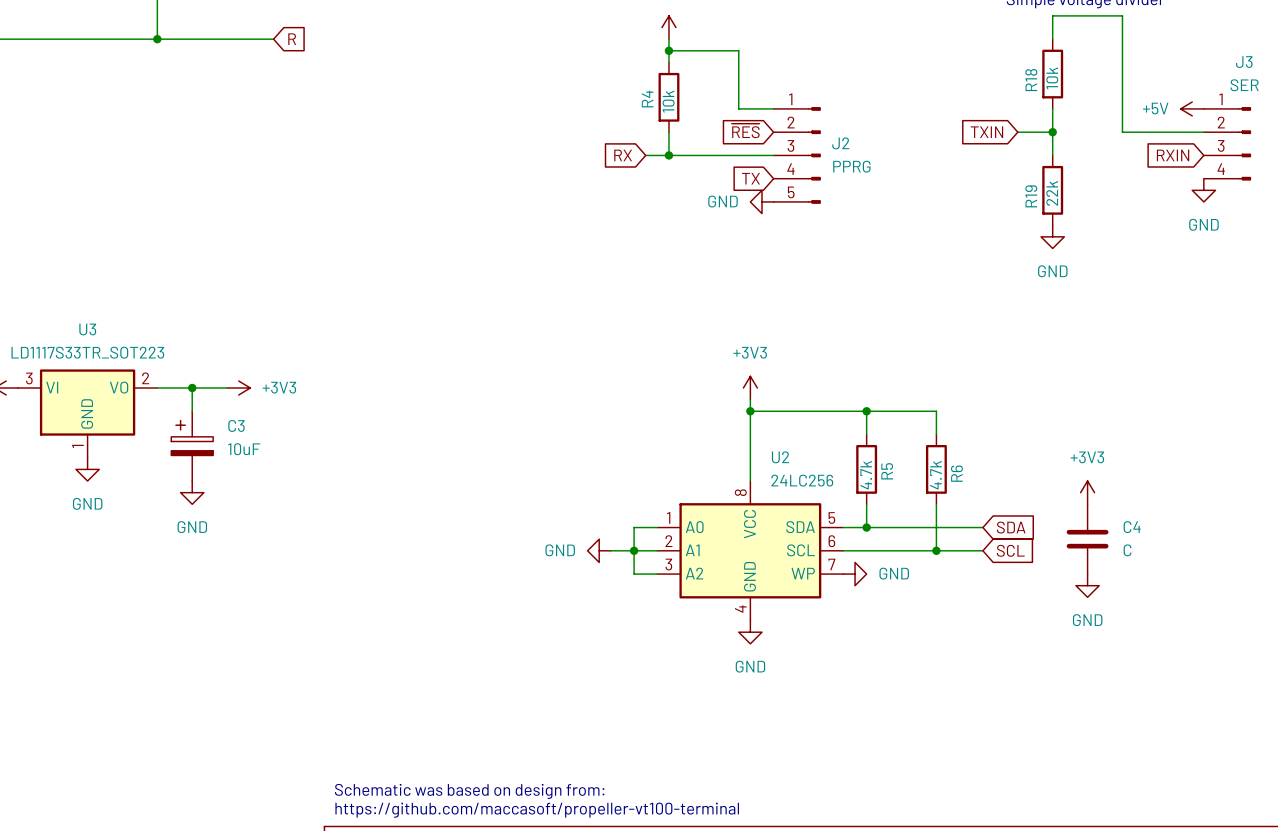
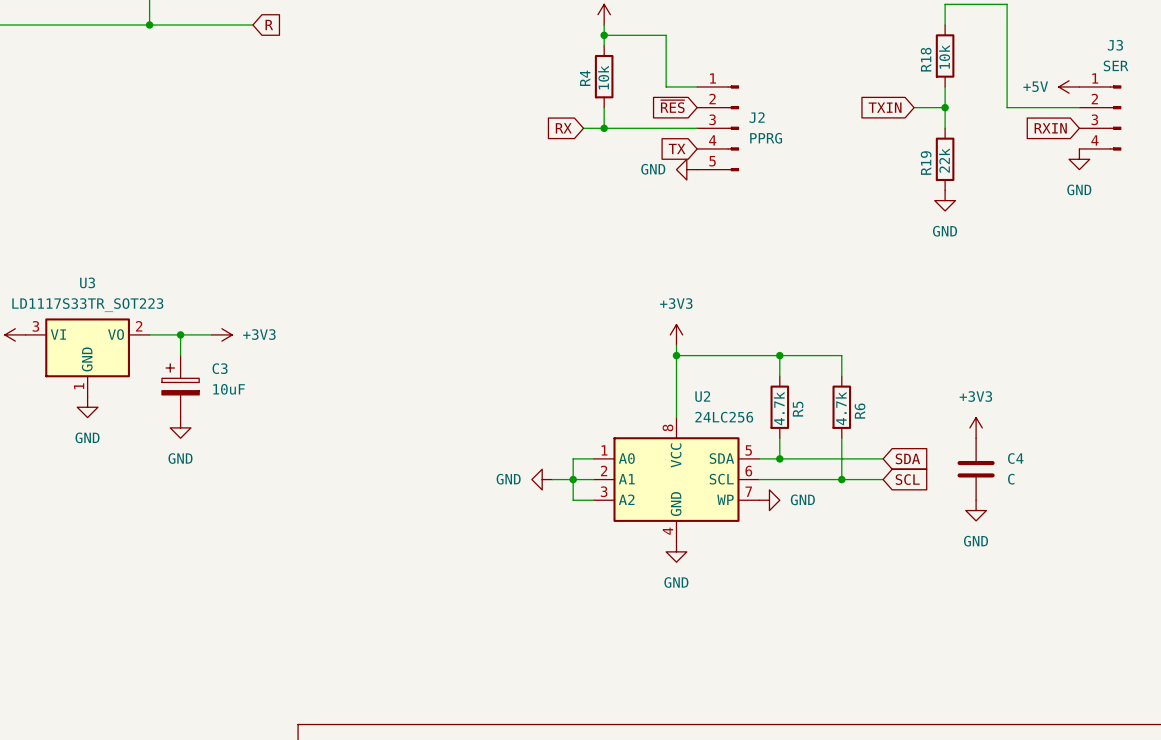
text: Schematic was based on design from: (469, 791) -> none
text: https://github.com/maccasoft/propeller-vt100-terminal (537, 810) -> none

